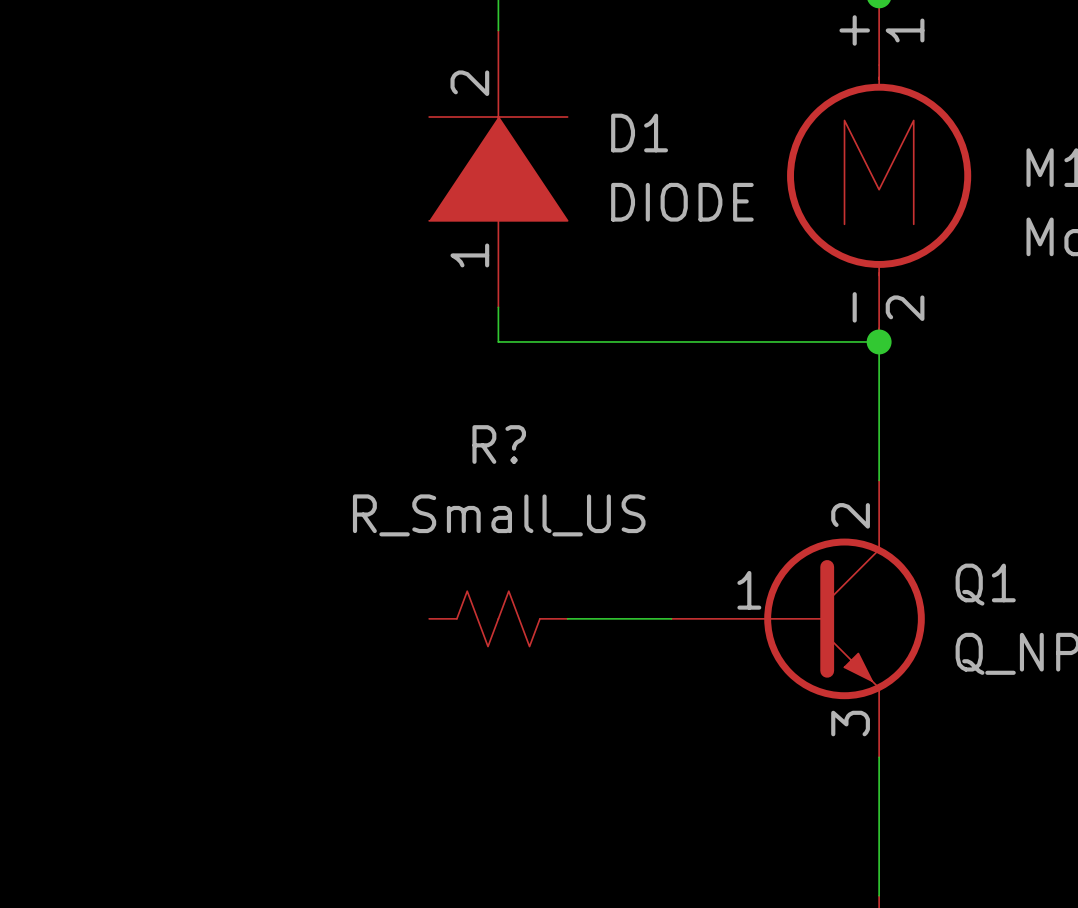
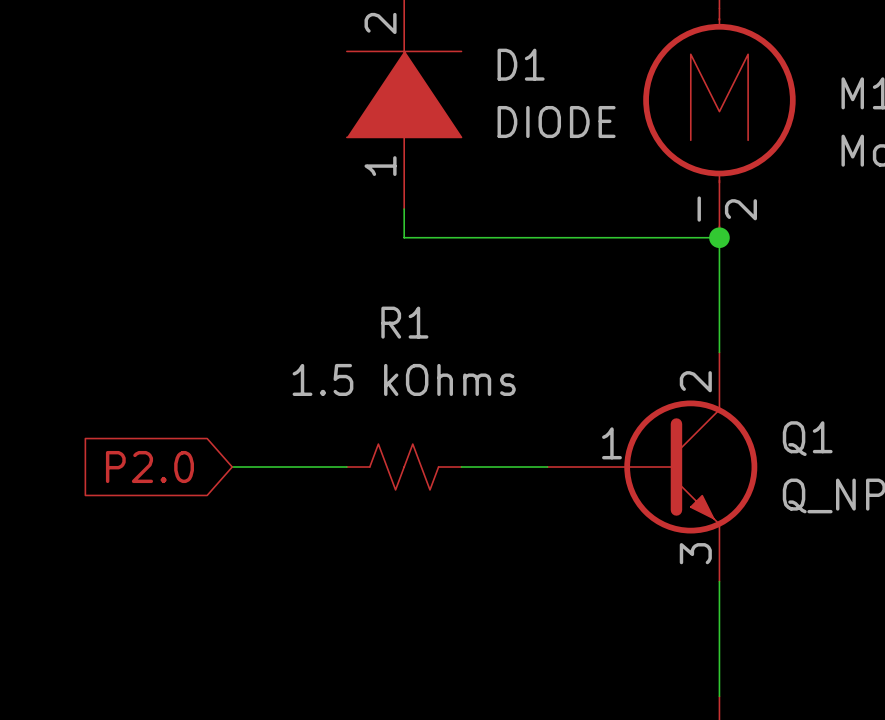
R? name: R? (499, 444) -> R1 (404, 322)
R? value: R_Small_US (499, 515) -> 1.5 kOhms (404, 379)
global label: none -> P2.0 (149, 467)
wire: none -> (232, 467) (346, 467)

